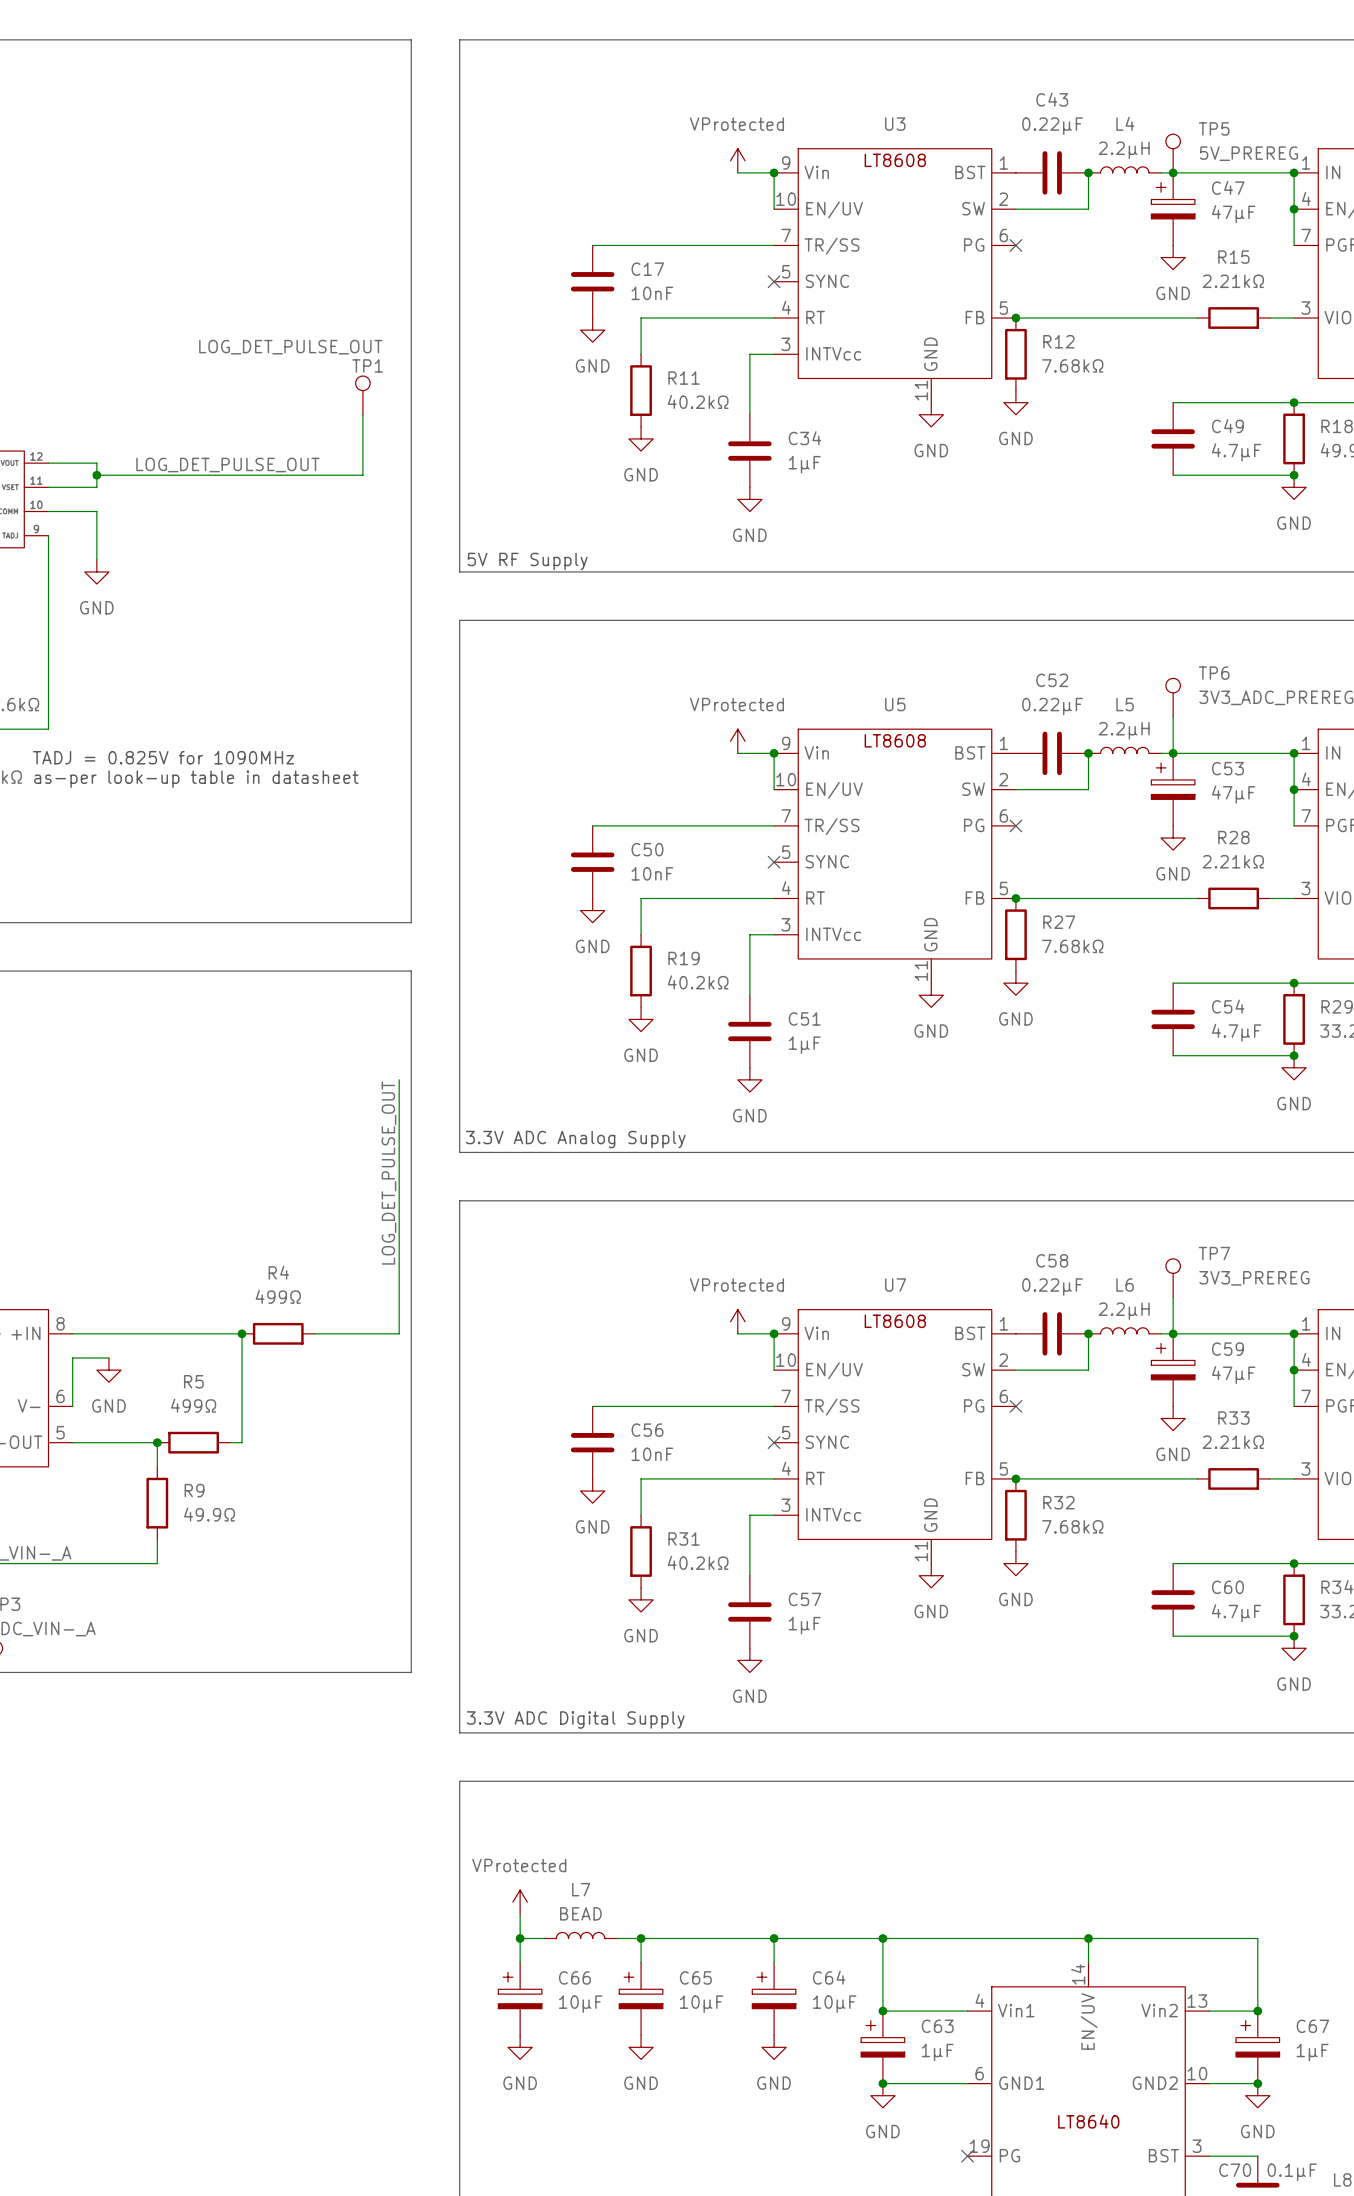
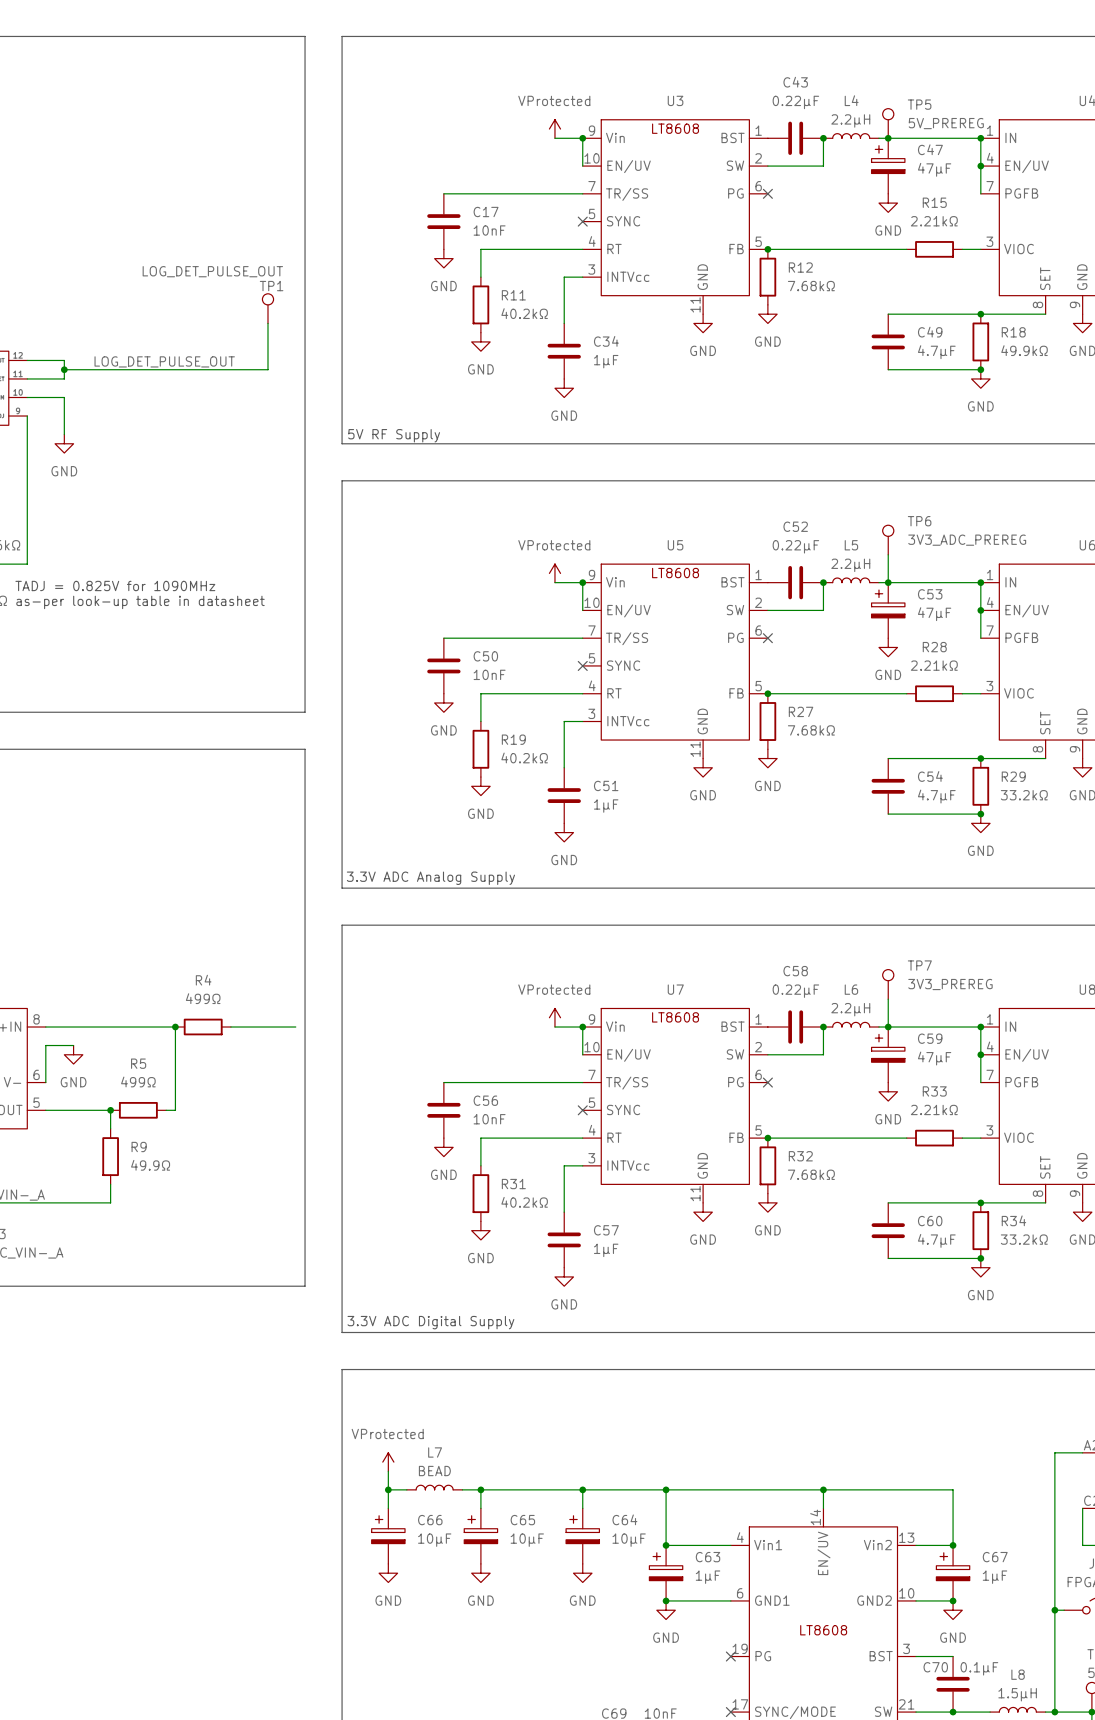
wire: (399, 1079) (399, 1333) -> none
label: LOG_DET_PULSE_OUT (388, 1172) -> none
part text: LT8640 (1088, 2121) -> LT8608 (823, 1630)

